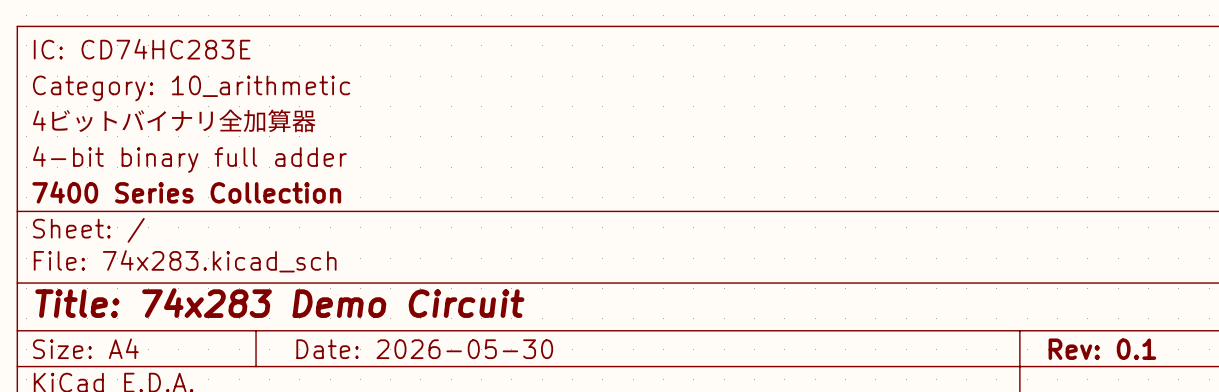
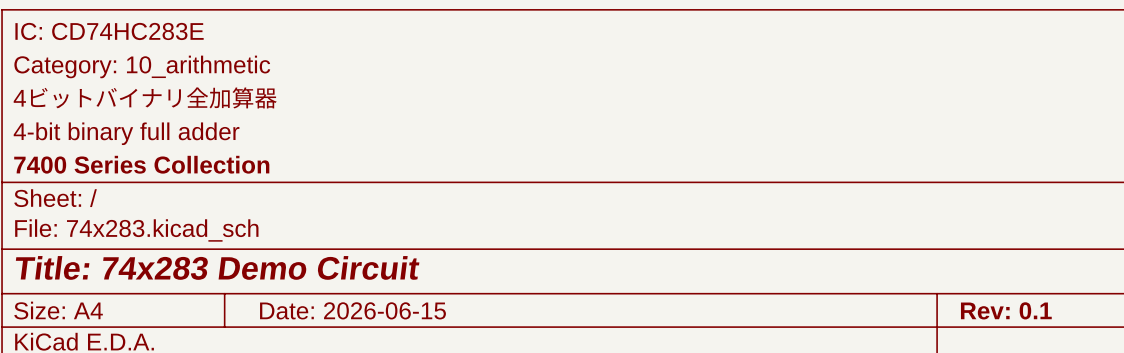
title block: Date: 2026-05-30 (424, 349) -> Date: 2026-06-15 (352, 310)

